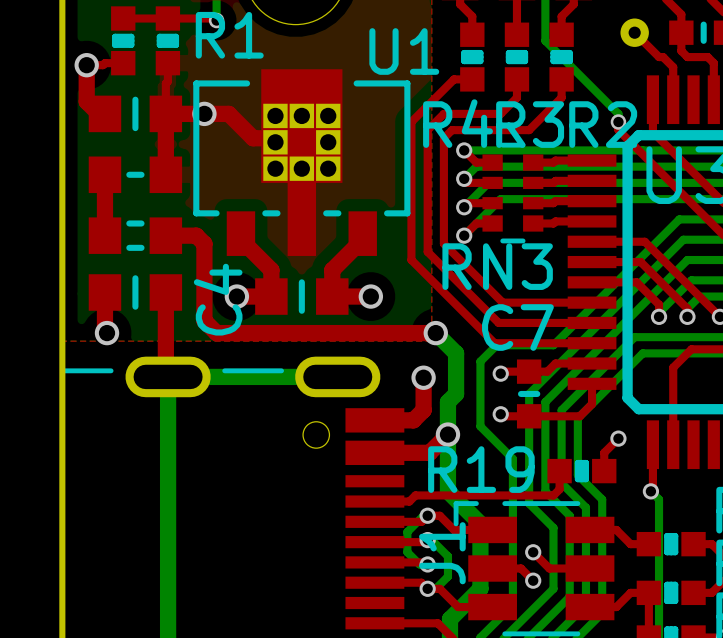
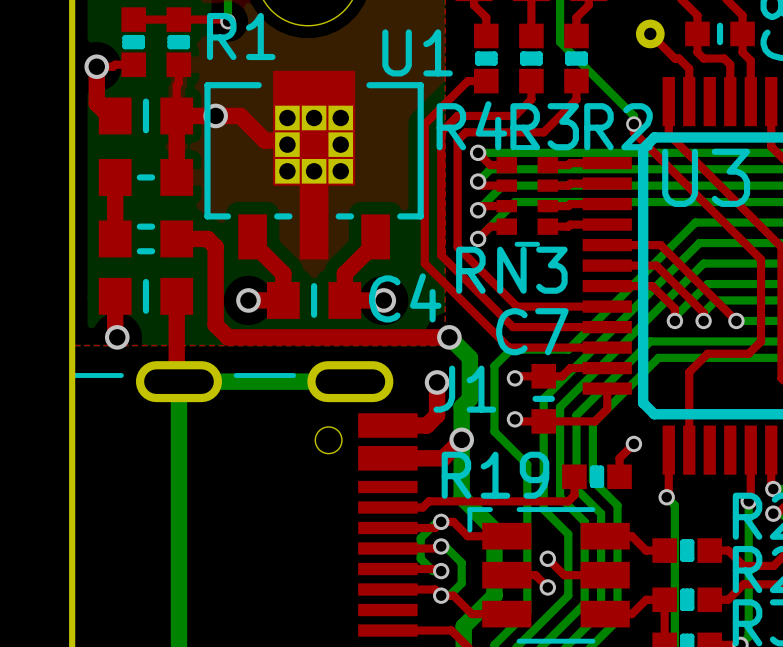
C4 name rotation: 0° (218, 299) -> 90° clockwise (405, 297)
C4 name position: C4 (218, 299) -> C4 (405, 297)
J1 name rotation: 0° (442, 553) -> 90° clockwise (464, 389)
J1 name position: J1 (442, 553) -> J1 (464, 389)

